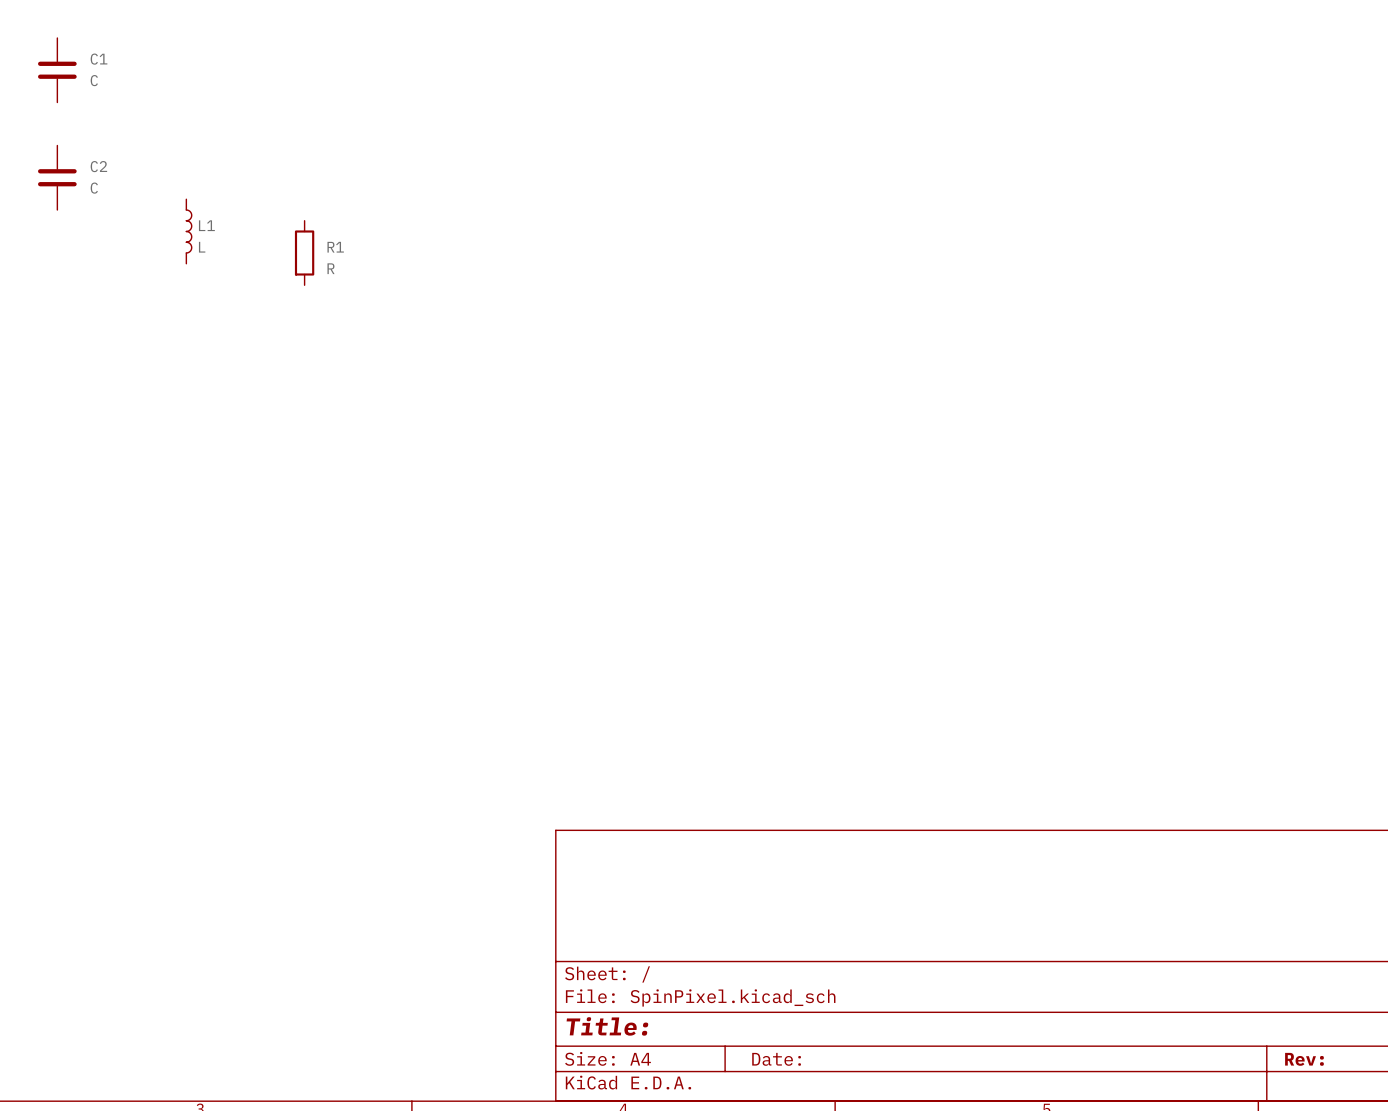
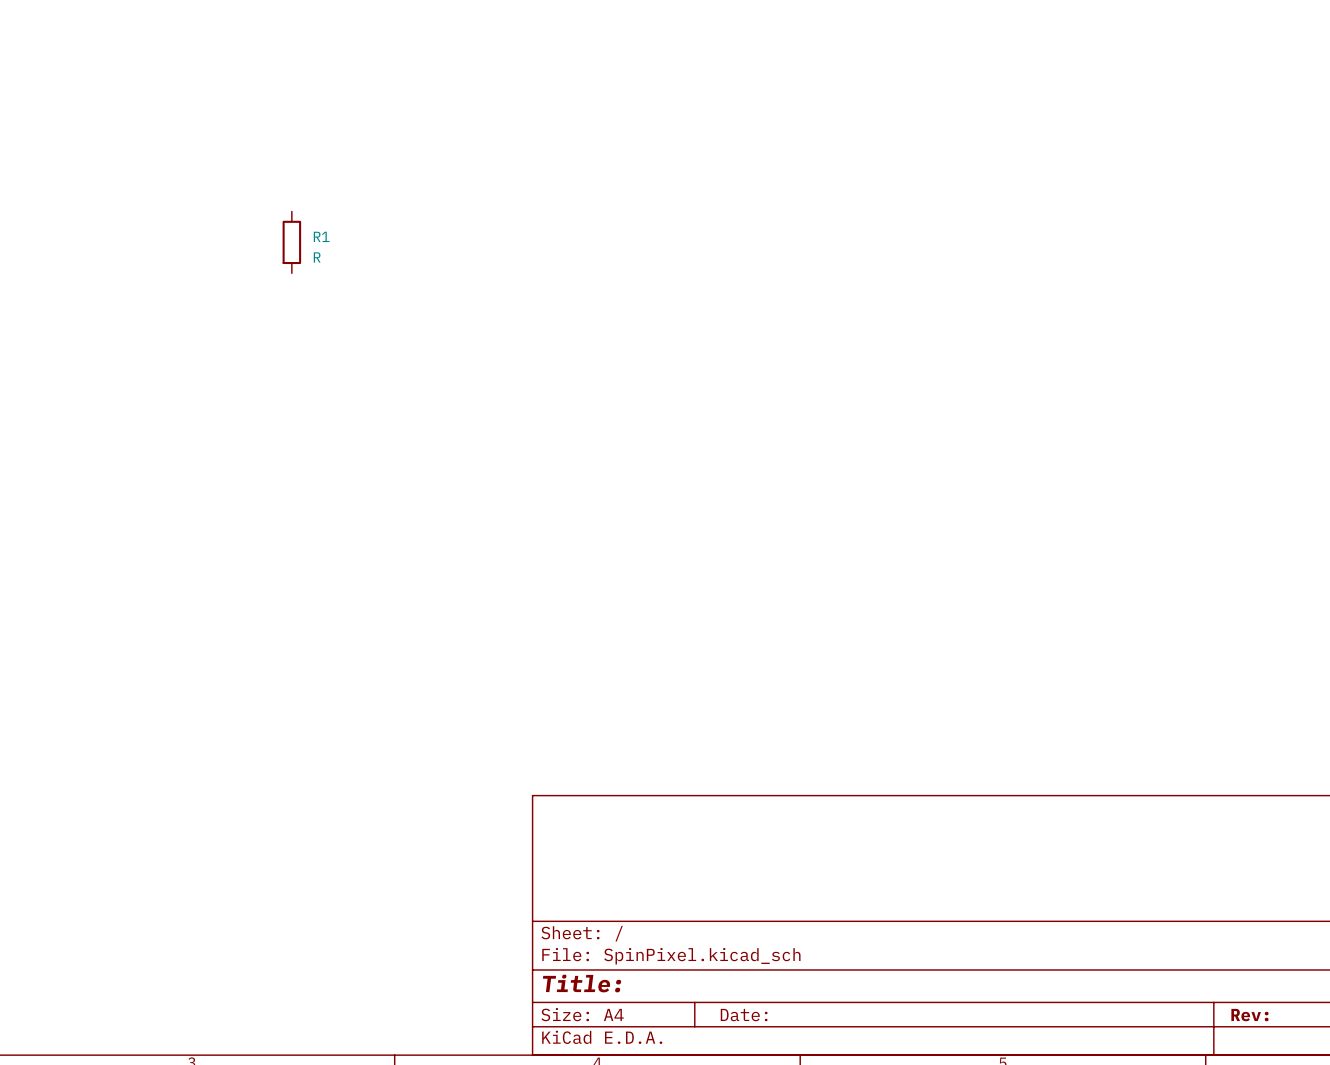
C1: C (57, 70) -> none
C2: C (57, 177) -> none
L1: L (189, 231) -> none

